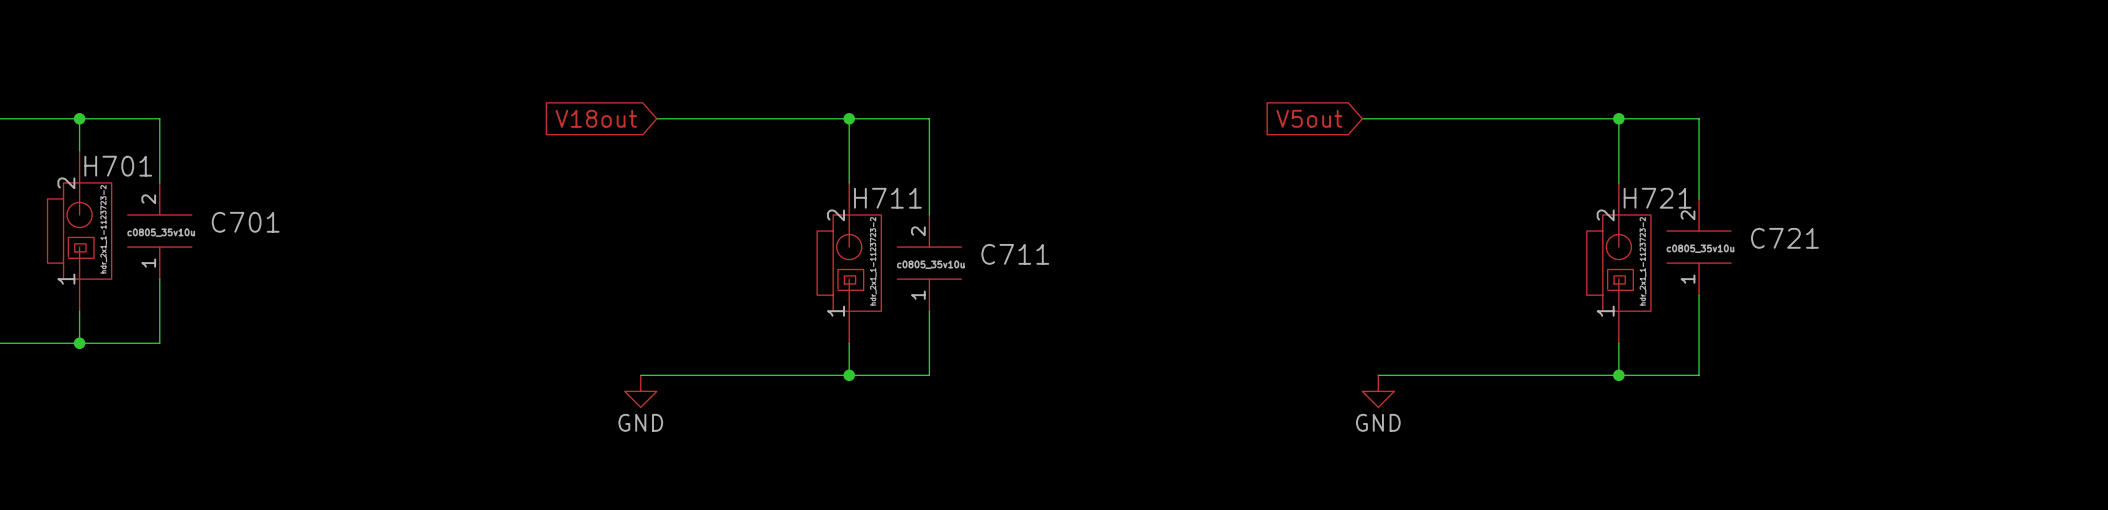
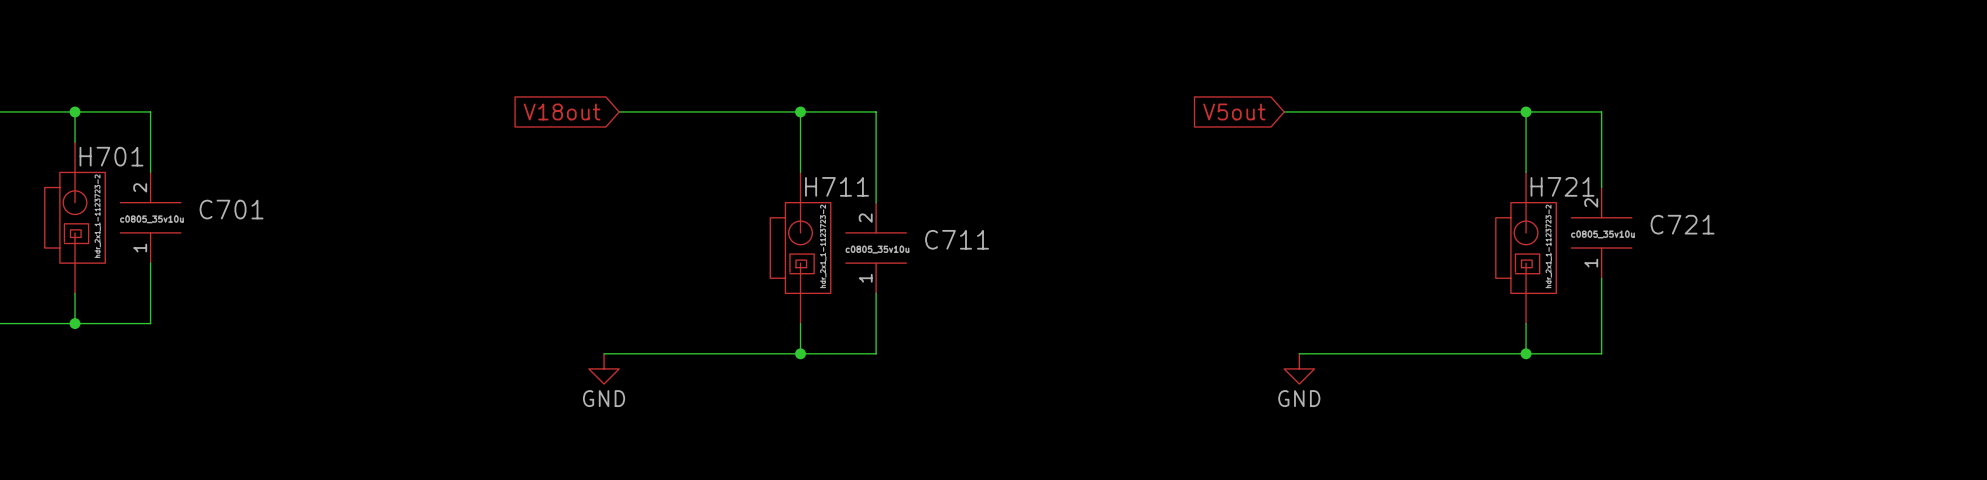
H701 pin name: 2 (66, 183) -> none
H711 pin name: 2 (835, 215) -> none
H721 pin name: 2 (1605, 215) -> none
H701 pin name: 1 (66, 279) -> none
H711 pin name: 1 (835, 311) -> none
H721 pin name: 1 (1605, 311) -> none

